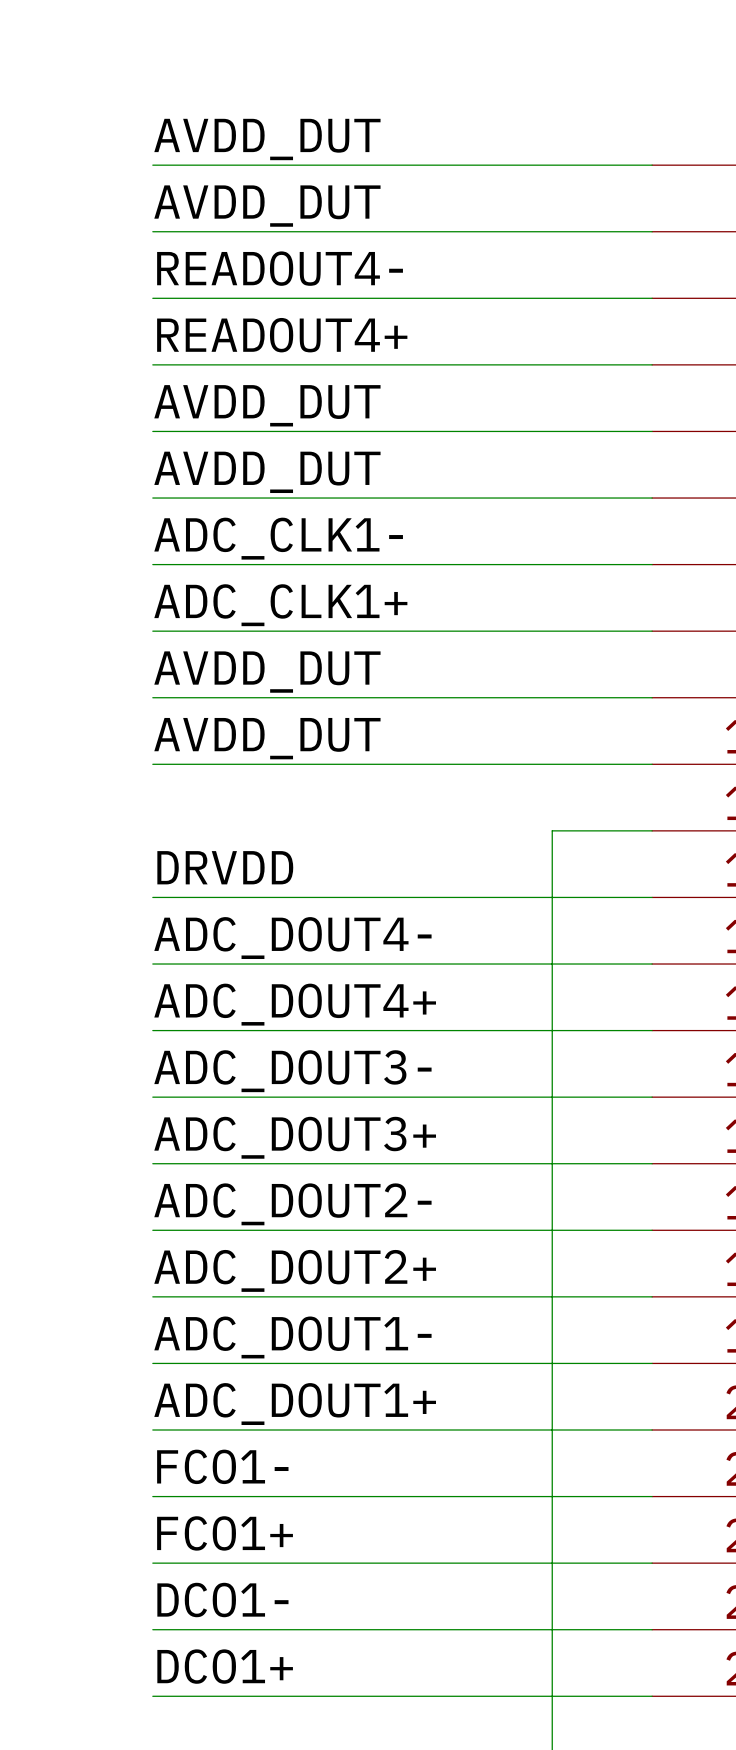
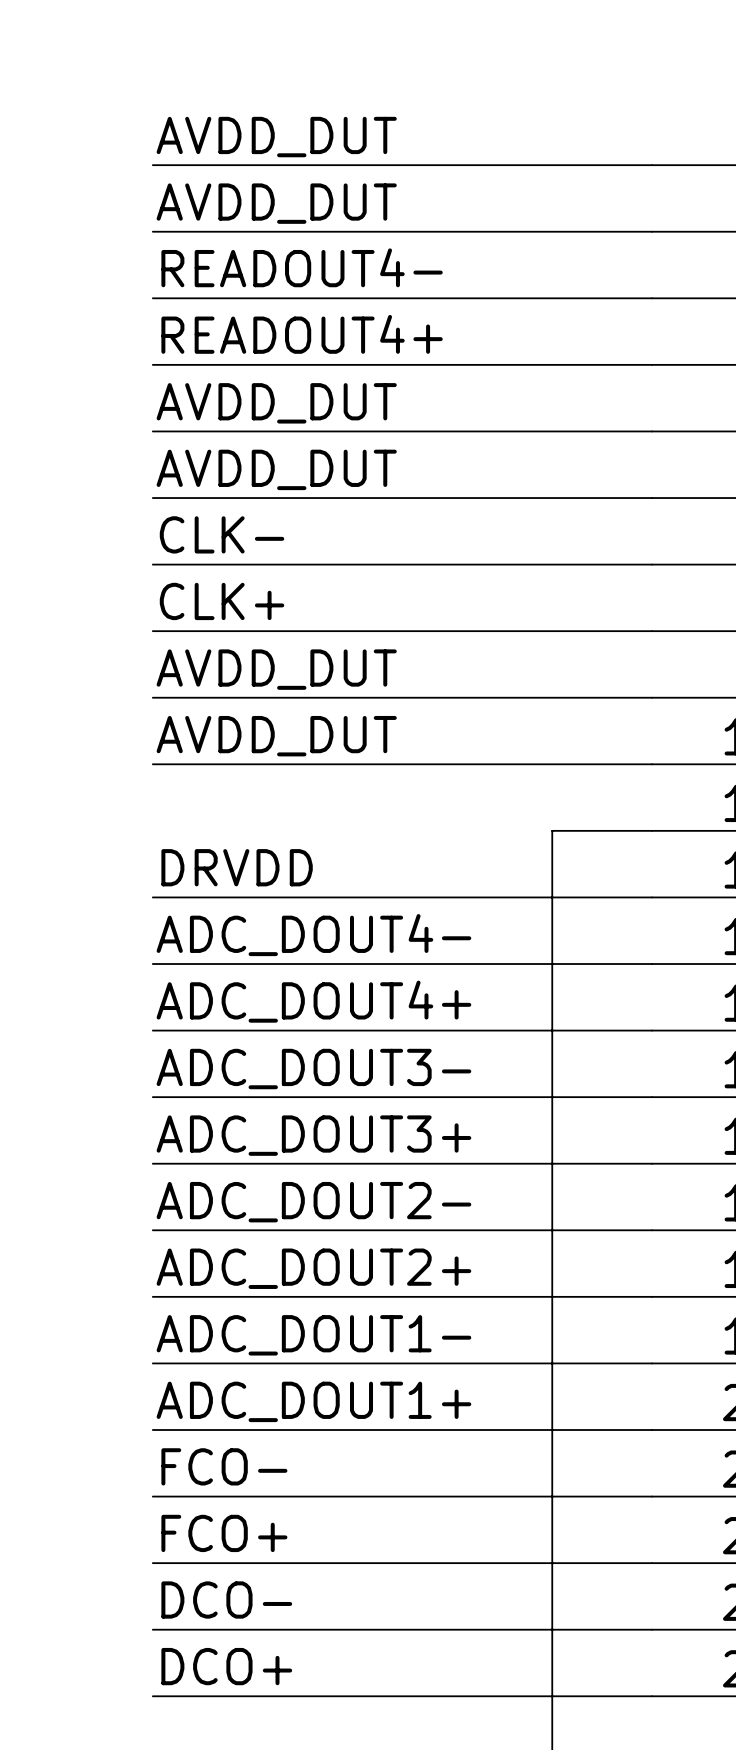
label: ADC_CLK1- (278, 538) -> CLK- (222, 534)
label: ADC_CLK1+ (280, 605) -> CLK+ (222, 601)
label: FCO1- (222, 1466) -> FCO- (224, 1466)
label: FCO1+ (225, 1533) -> FCO+ (224, 1533)
label: DCO1- (222, 1600) -> DCO- (226, 1600)
label: DCO1+ (225, 1666) -> DCO+ (226, 1666)

